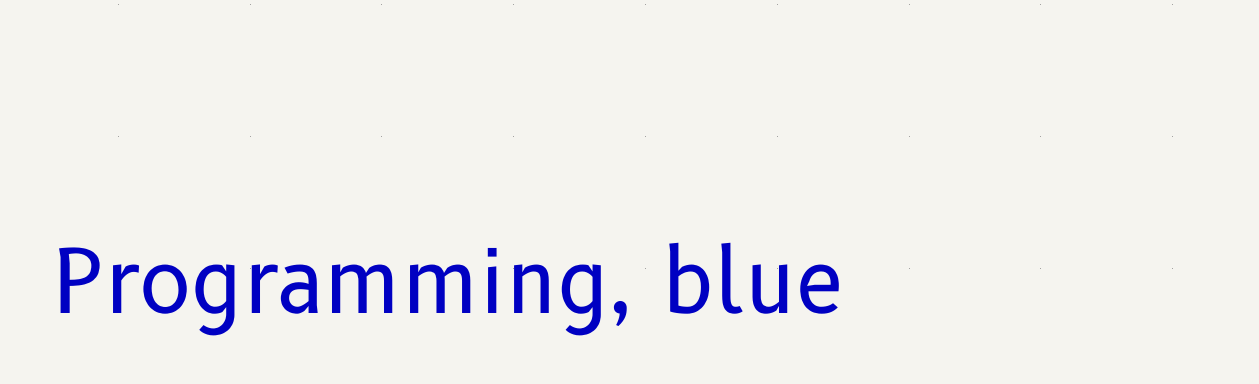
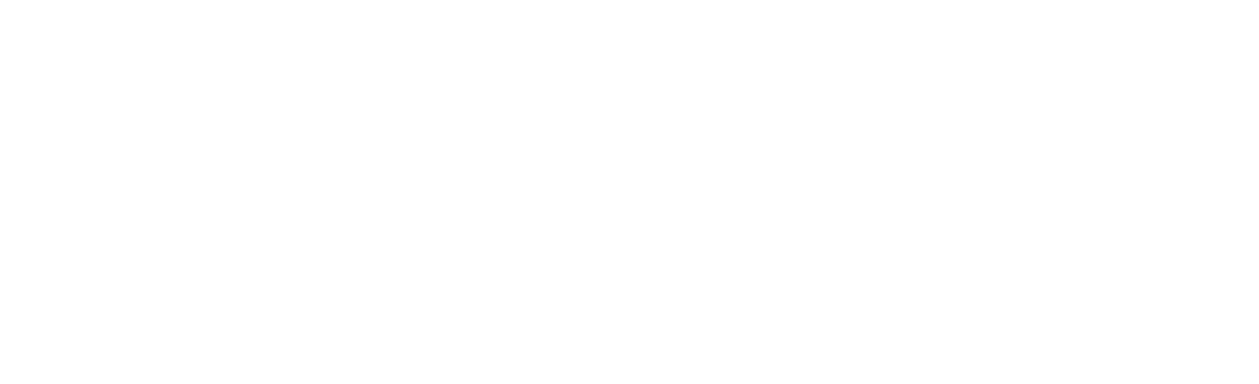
text: Programming, blue (448, 289) -> none

